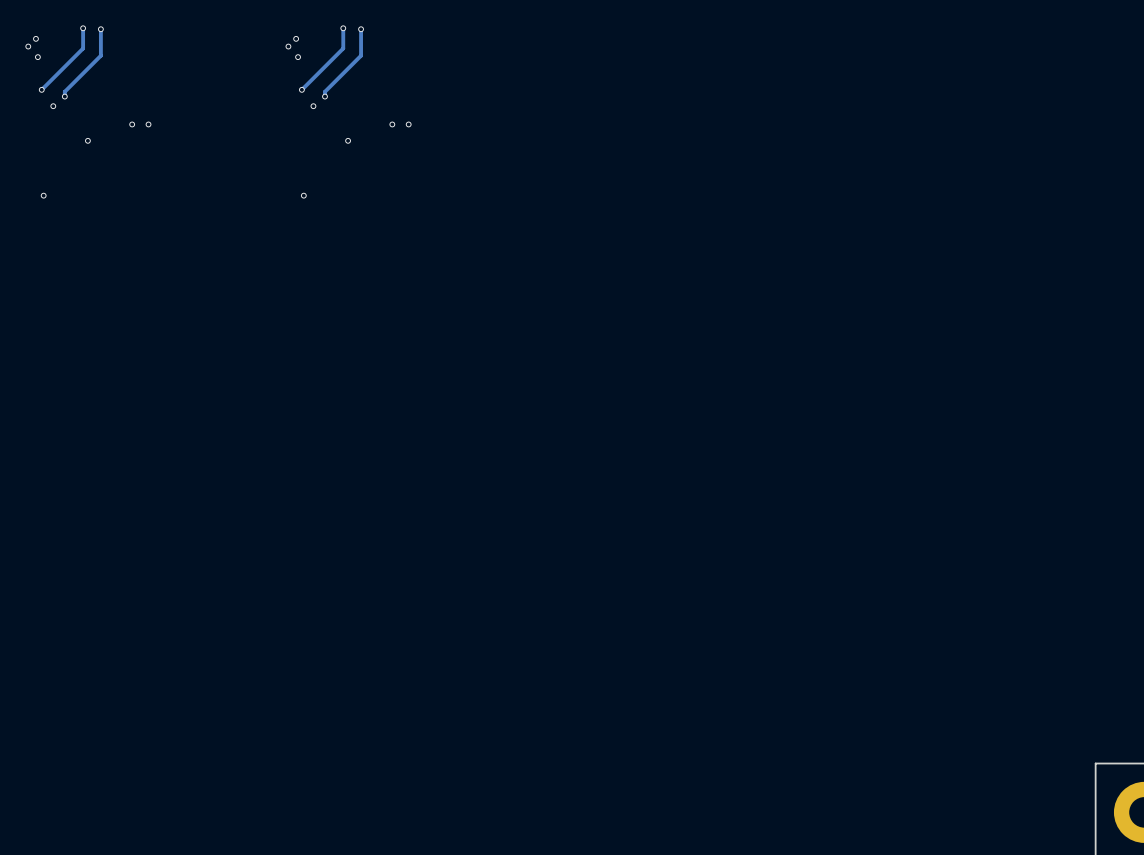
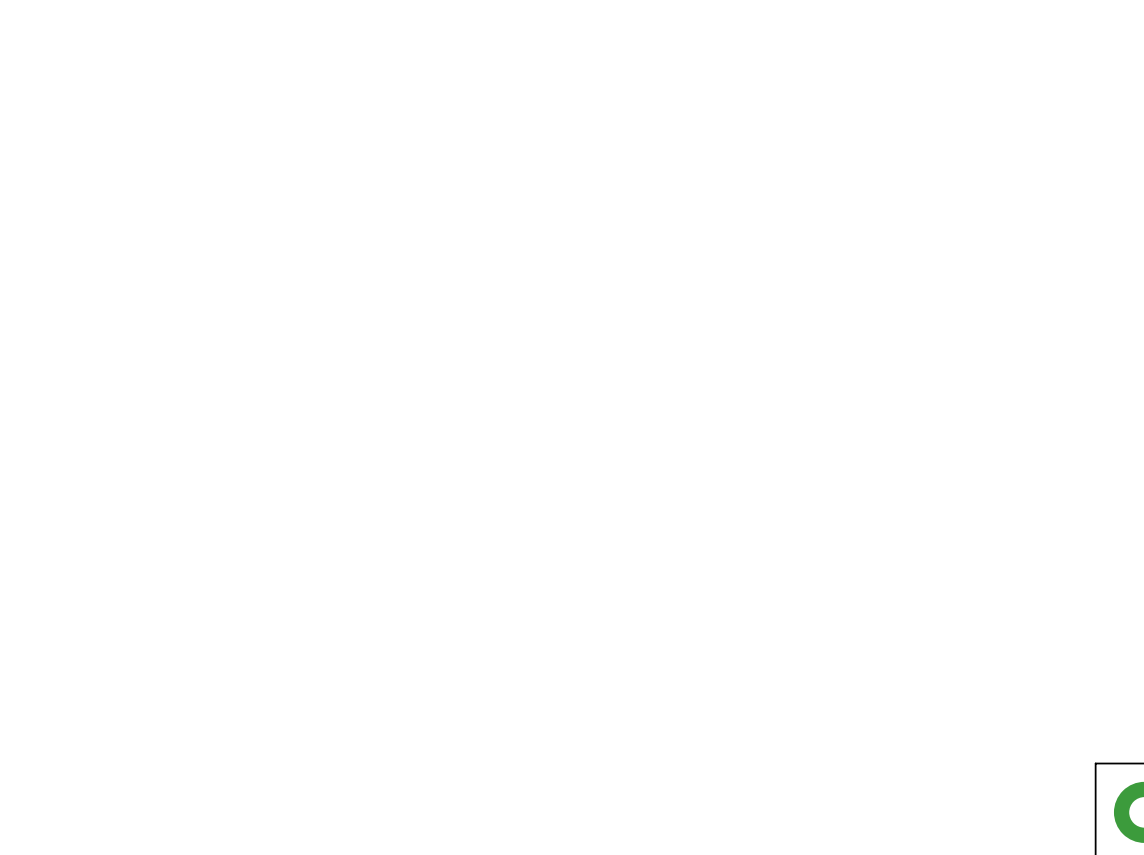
track: (83, 28) (83, 48) (41, 89) -> none
via: (83, 28) -> none
track: (343, 28) (343, 48) (301, 89) -> none
via: (343, 28) -> none
track: (100, 29) (100, 55) (64, 91) (64, 96) -> none
via: (100, 29) -> none
track: (361, 29) (361, 55) (324, 91) (324, 96) -> none
via: (361, 29) -> none
via: (35, 38) -> none
via: (296, 38) -> none
via: (28, 46) -> none
via: (288, 46) -> none
via: (37, 57) -> none
via: (298, 57) -> none
via: (41, 89) -> none
via: (301, 89) -> none
via: (64, 96) -> none
via: (324, 96) -> none
via: (53, 106) -> none
via: (313, 106) -> none
via: (132, 124) -> none
via: (148, 124) -> none
via: (392, 124) -> none
via: (408, 124) -> none
via: (87, 140) -> none
via: (348, 140) -> none
via: (43, 195) -> none
via: (303, 195) -> none

